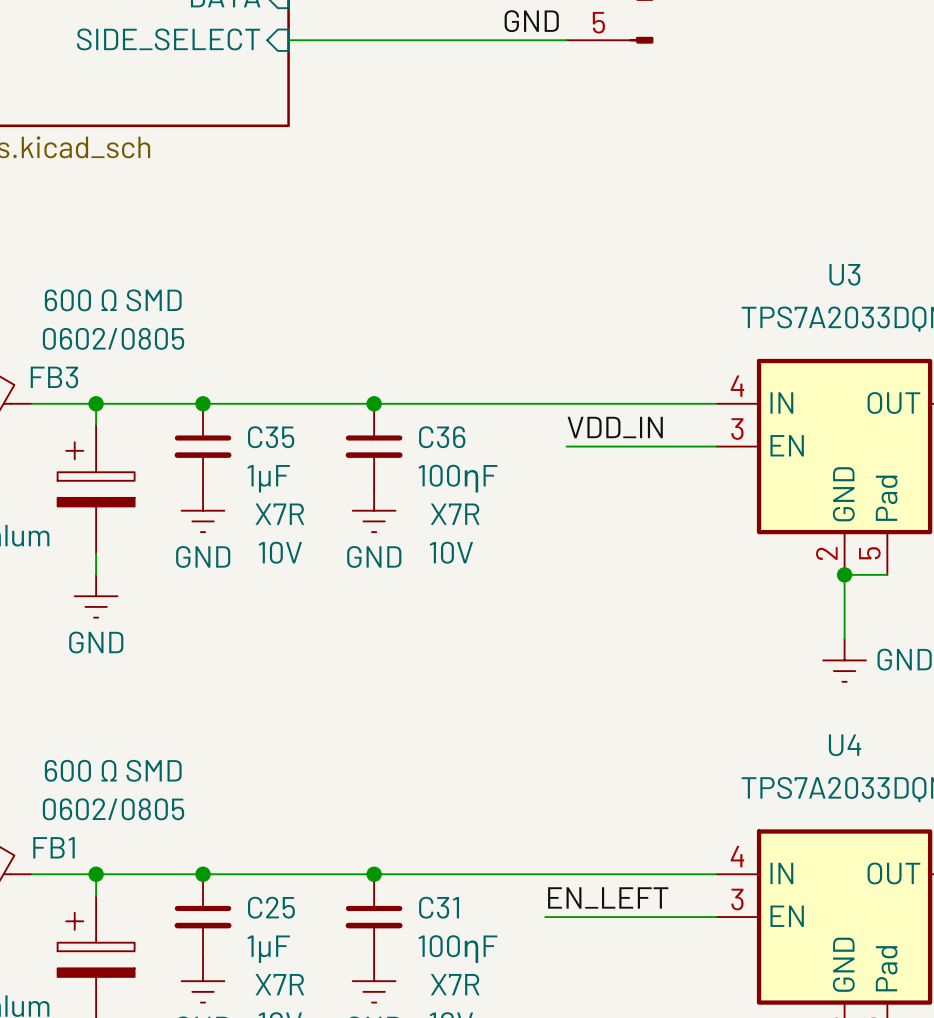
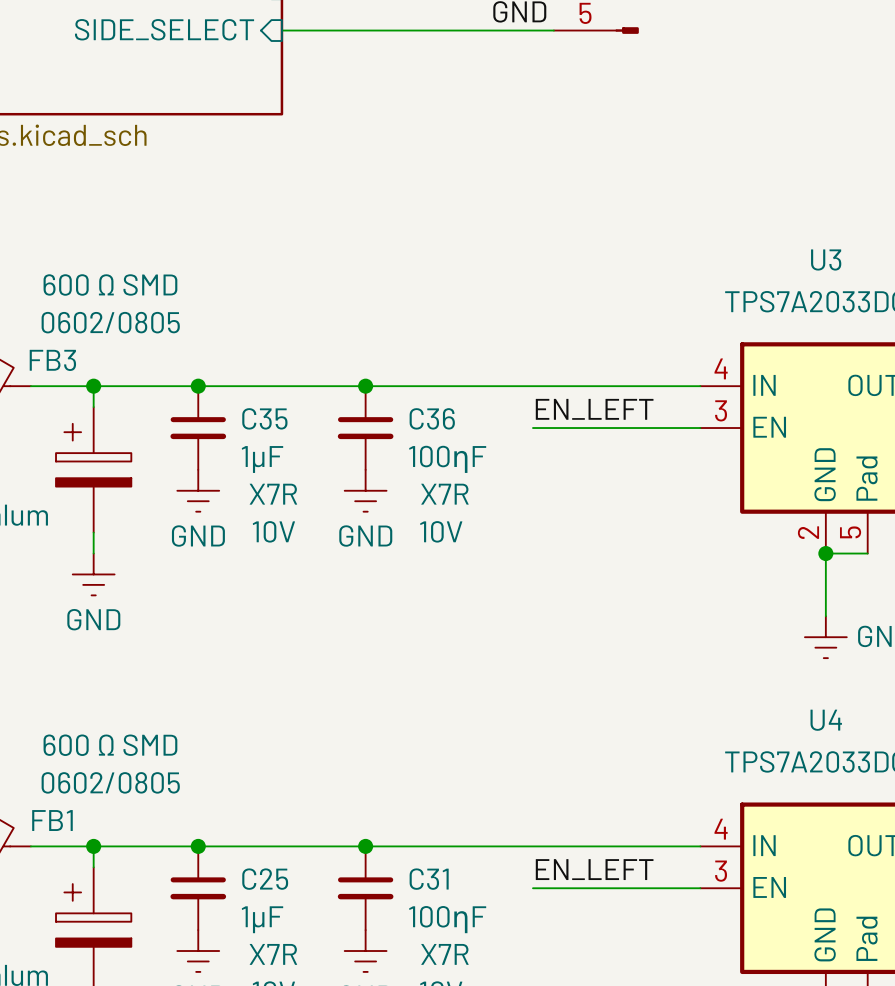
label: none -> EN_LEFT (594, 409)
label: VDD_IN (615, 427) -> none
wire: none -> (532, 428) (553, 428)

